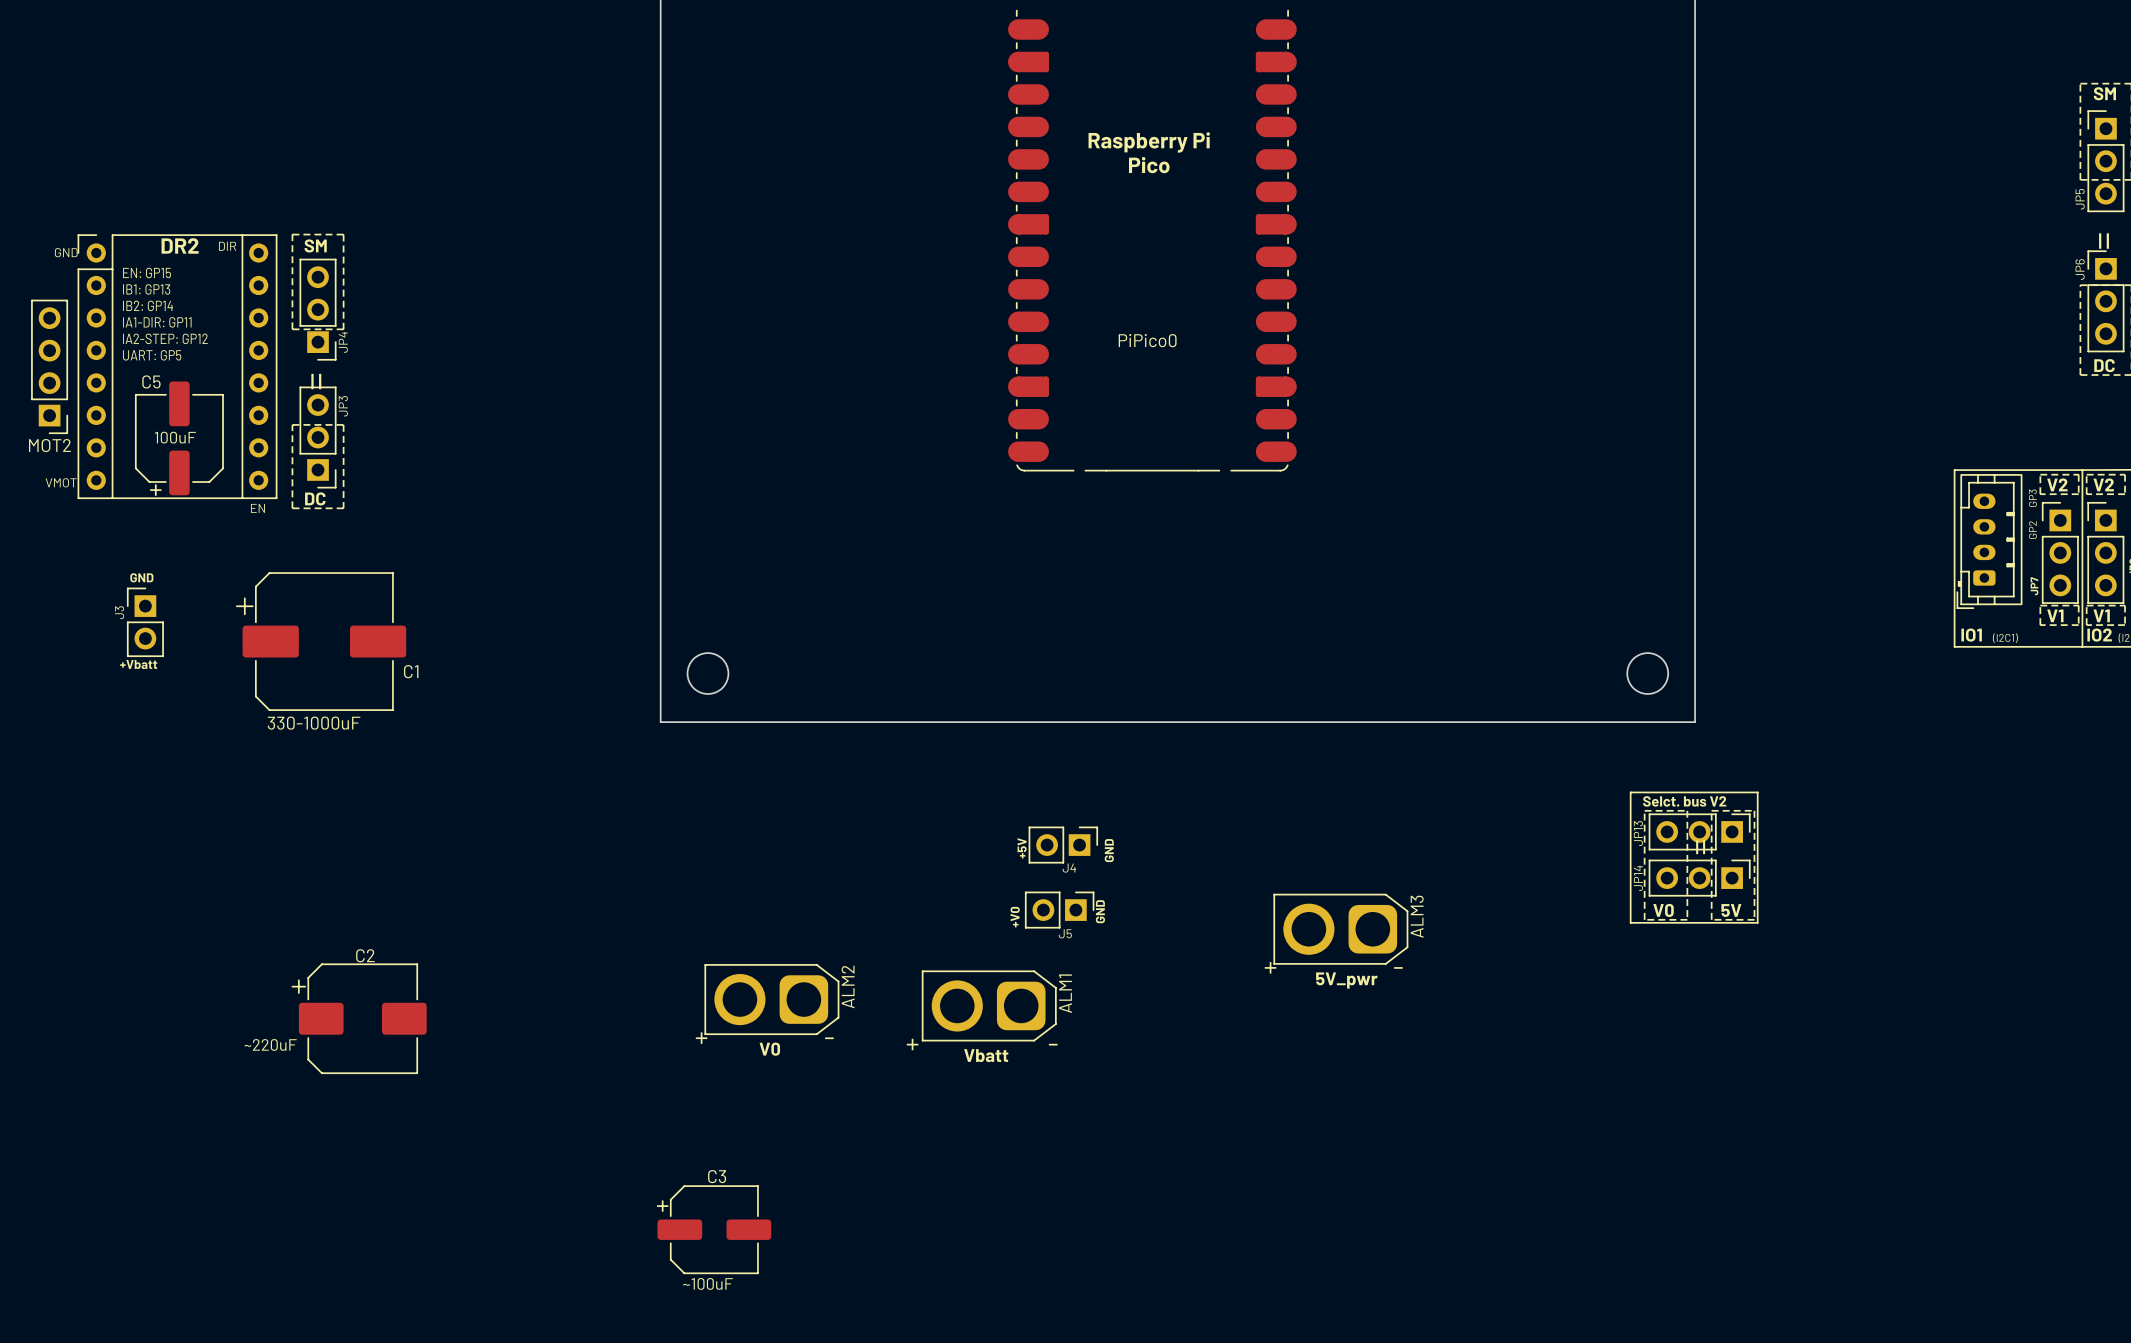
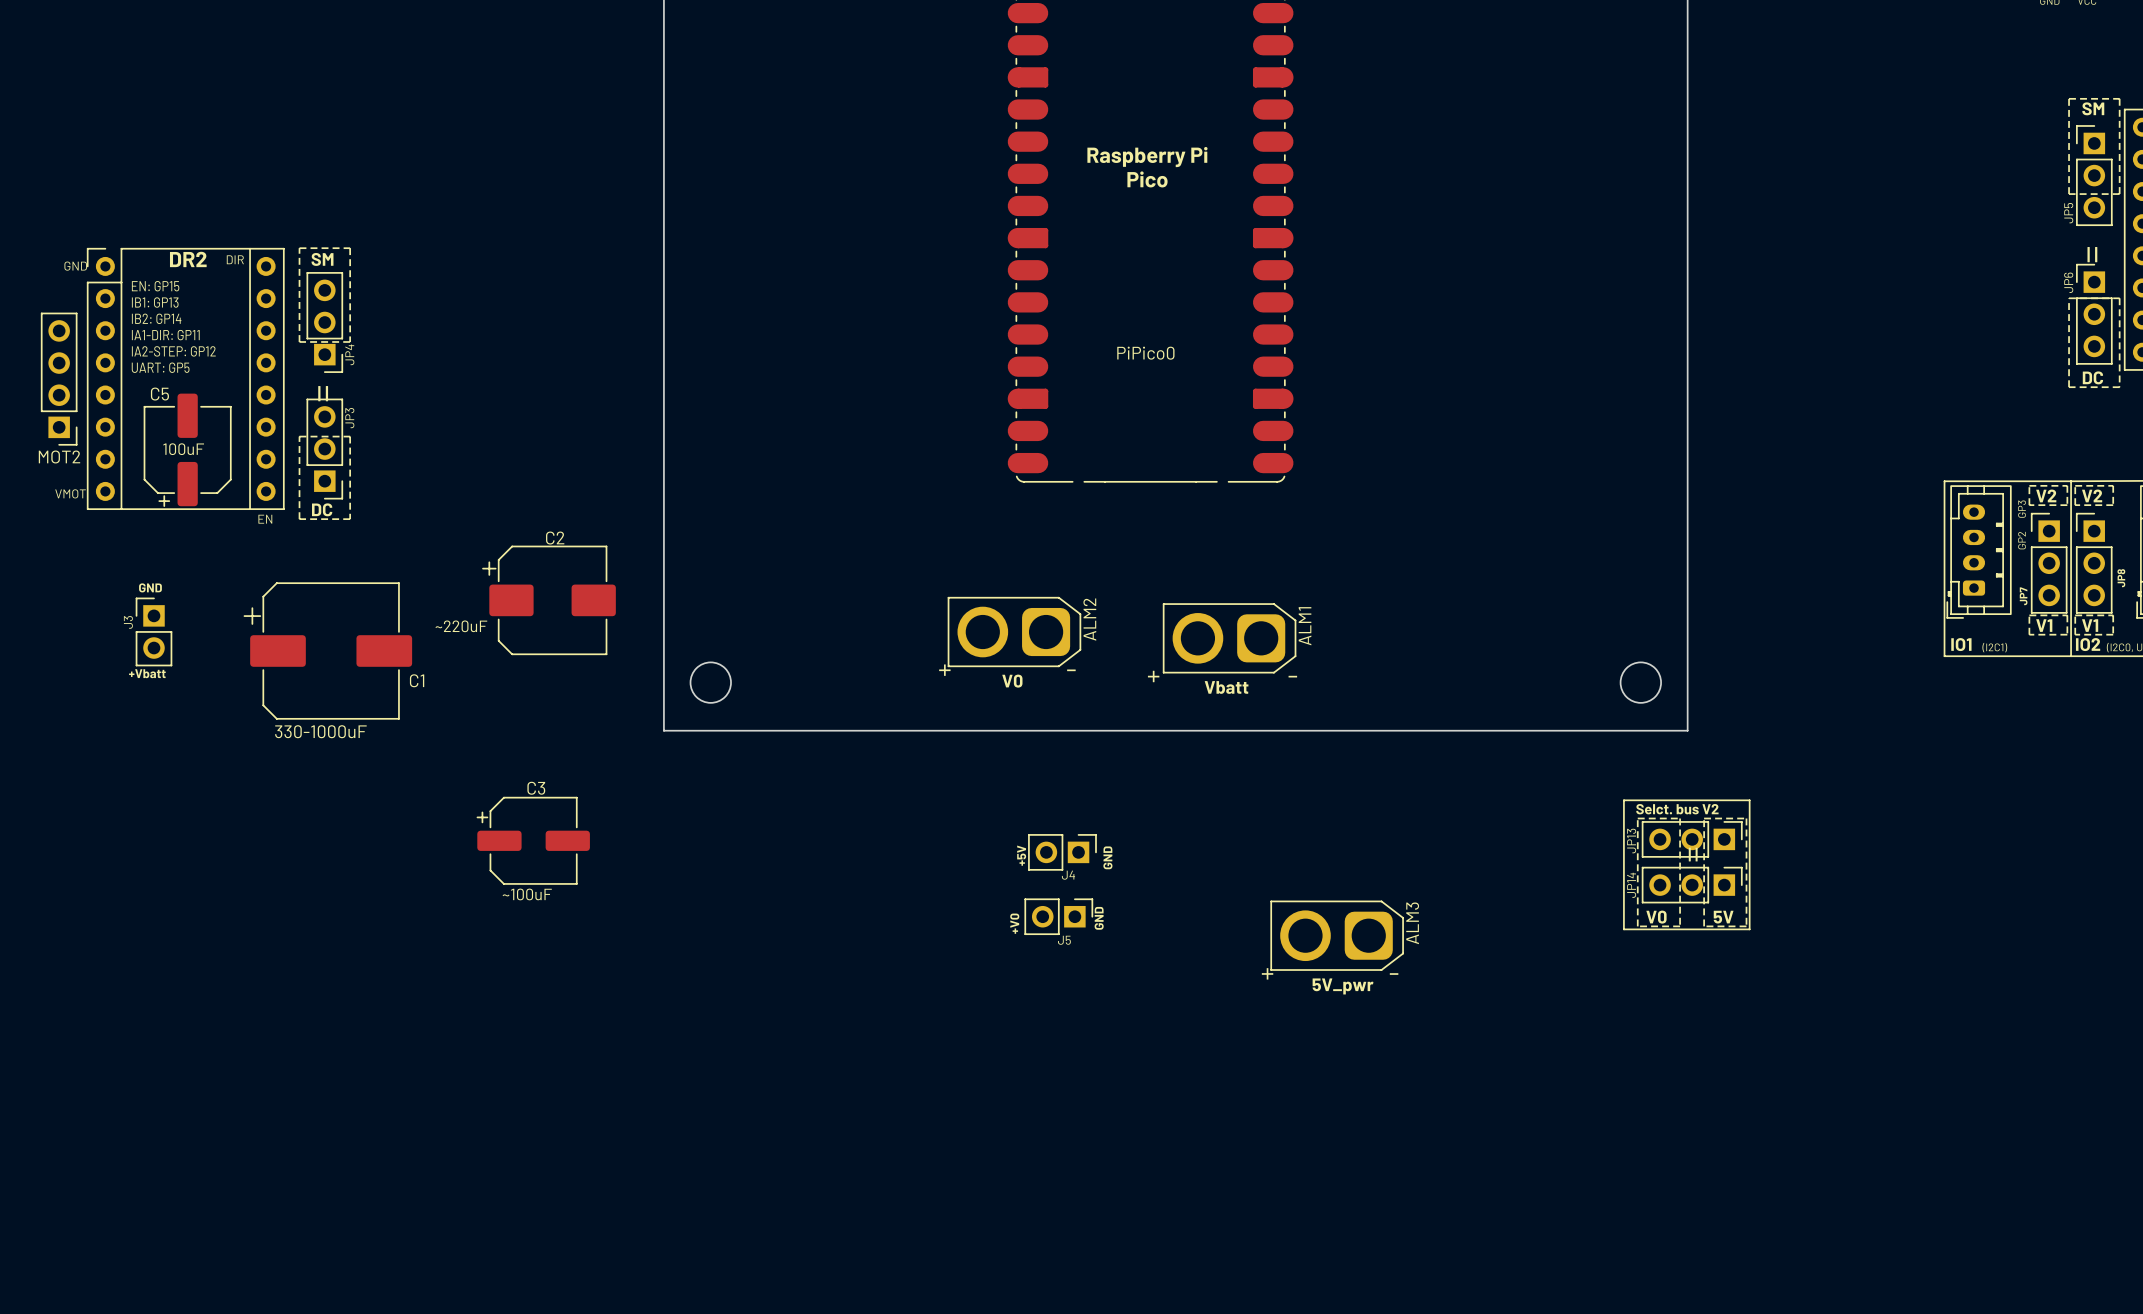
text: none -> ~220uF (461, 626)
text: none -> V0 (1012, 681)
text: none -> Vbatt (1226, 687)
text: none -> ~100uF (527, 894)
ALM2 position: (771, 999) -> (1014, 632)
ALM1 position: (989, 1005) -> (1229, 638)
C2 position: (359, 1018) -> (549, 600)
text: ~220uF (270, 1044) -> none
text: V0 (769, 1049) -> none
text: Vbatt (986, 1055) -> none
C3 position: (714, 1229) -> (533, 840)
text: ~100uF (707, 1283) -> none

